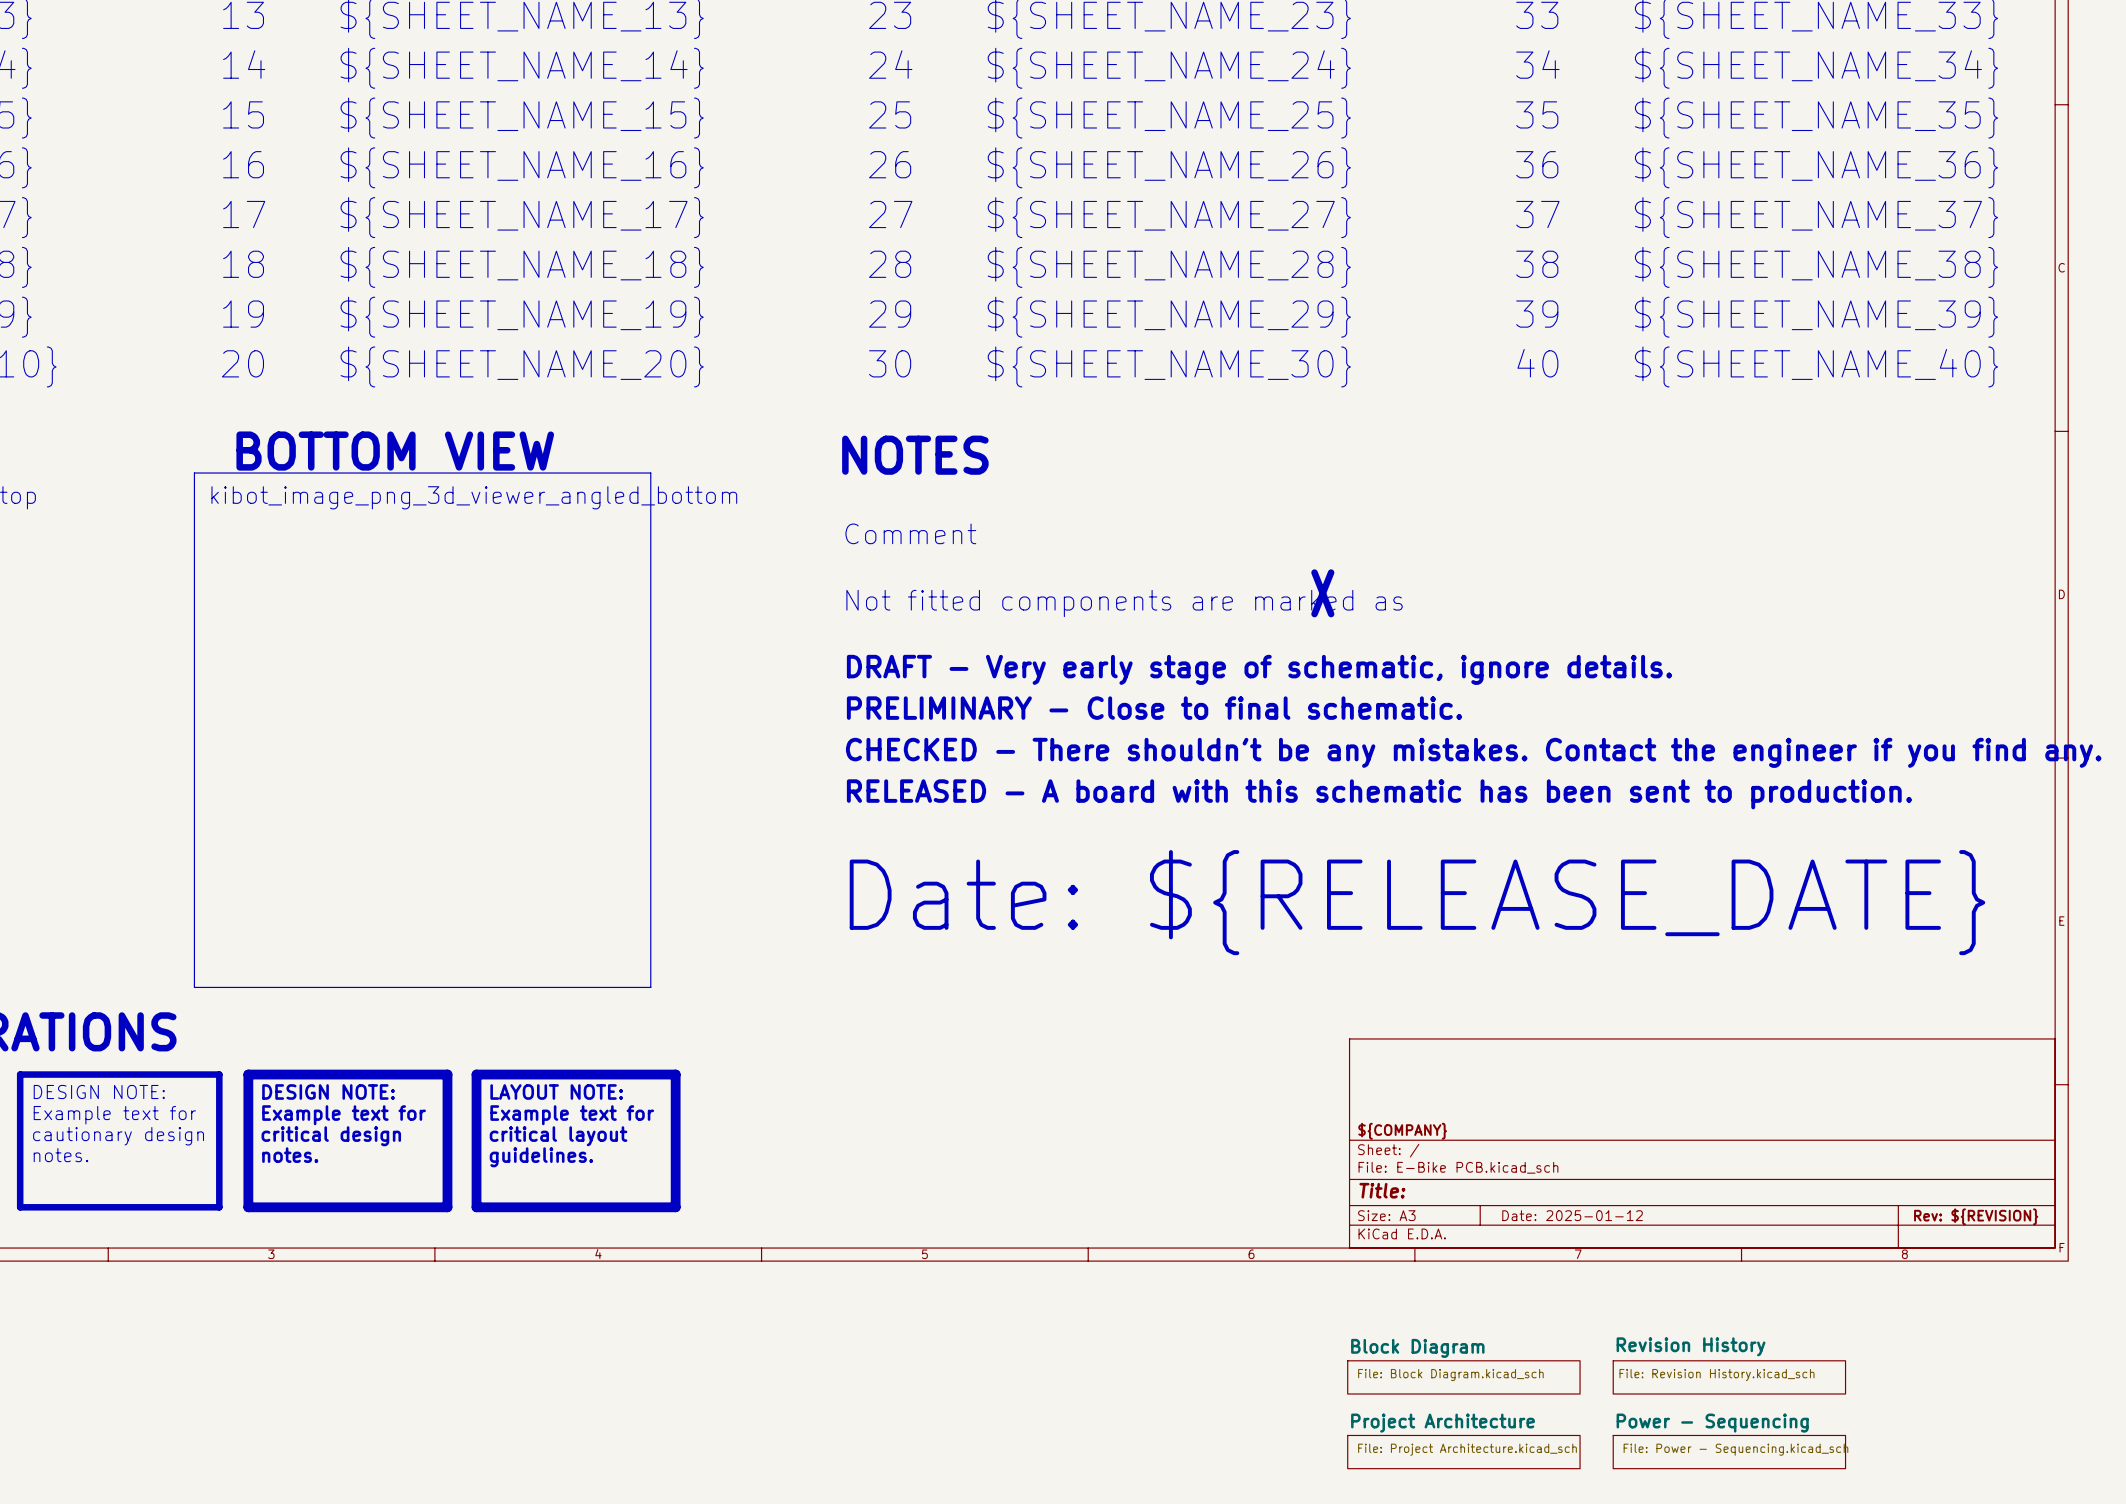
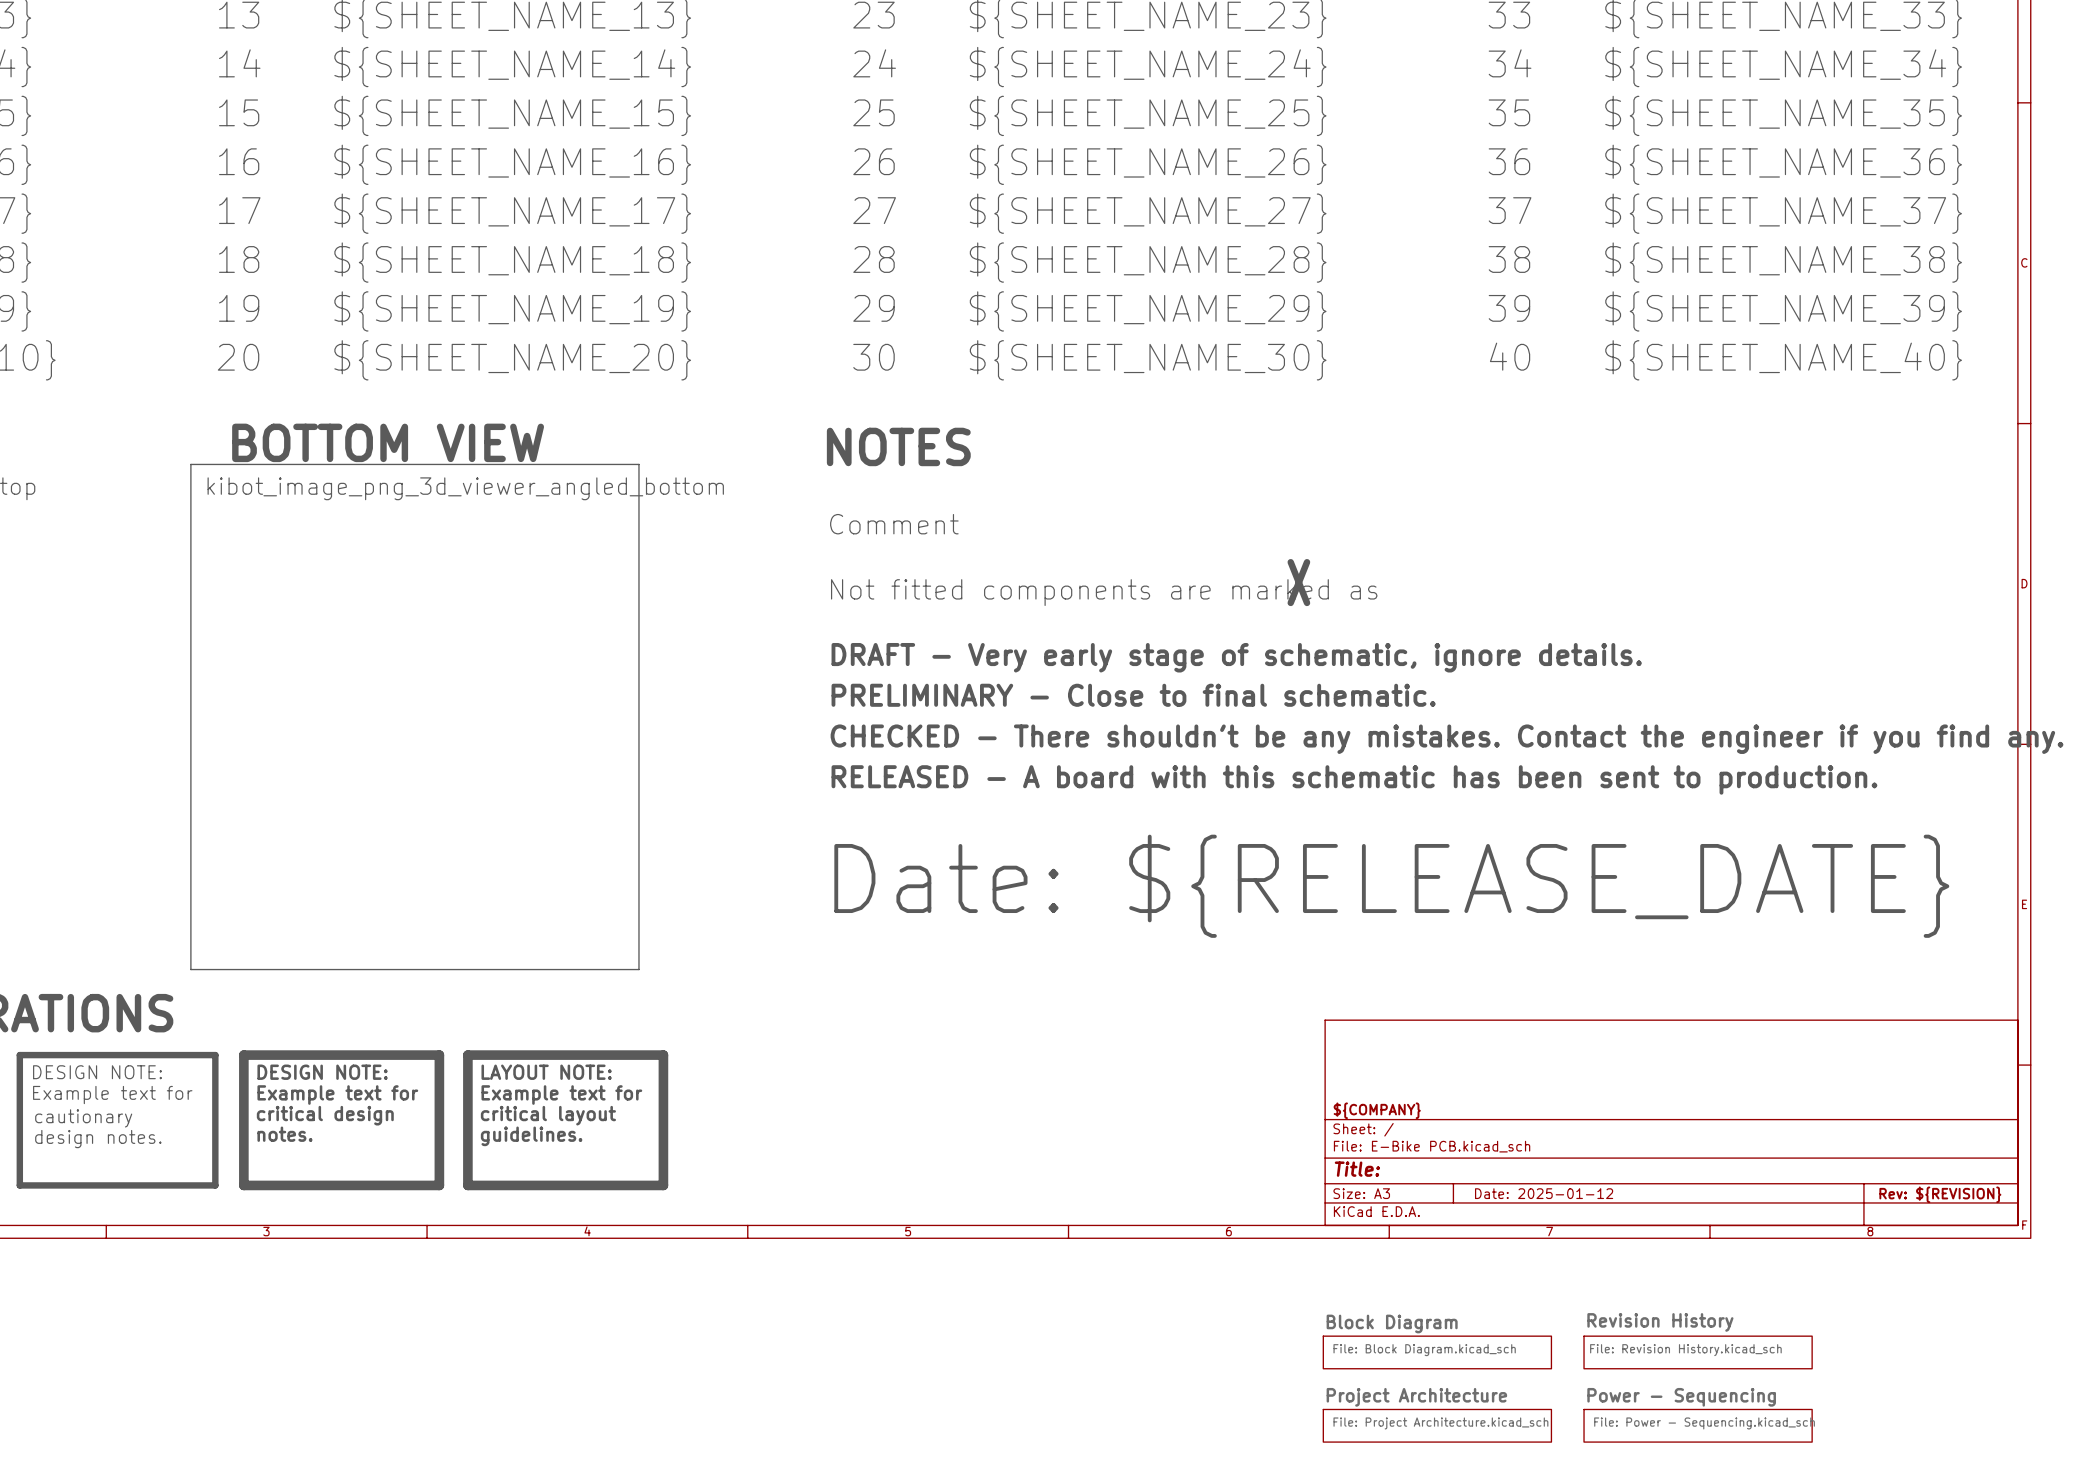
text: cautionary design (118, 1136) -> cautionary (83, 1118)
text: notes. (61, 1155) -> design notes. (98, 1139)

